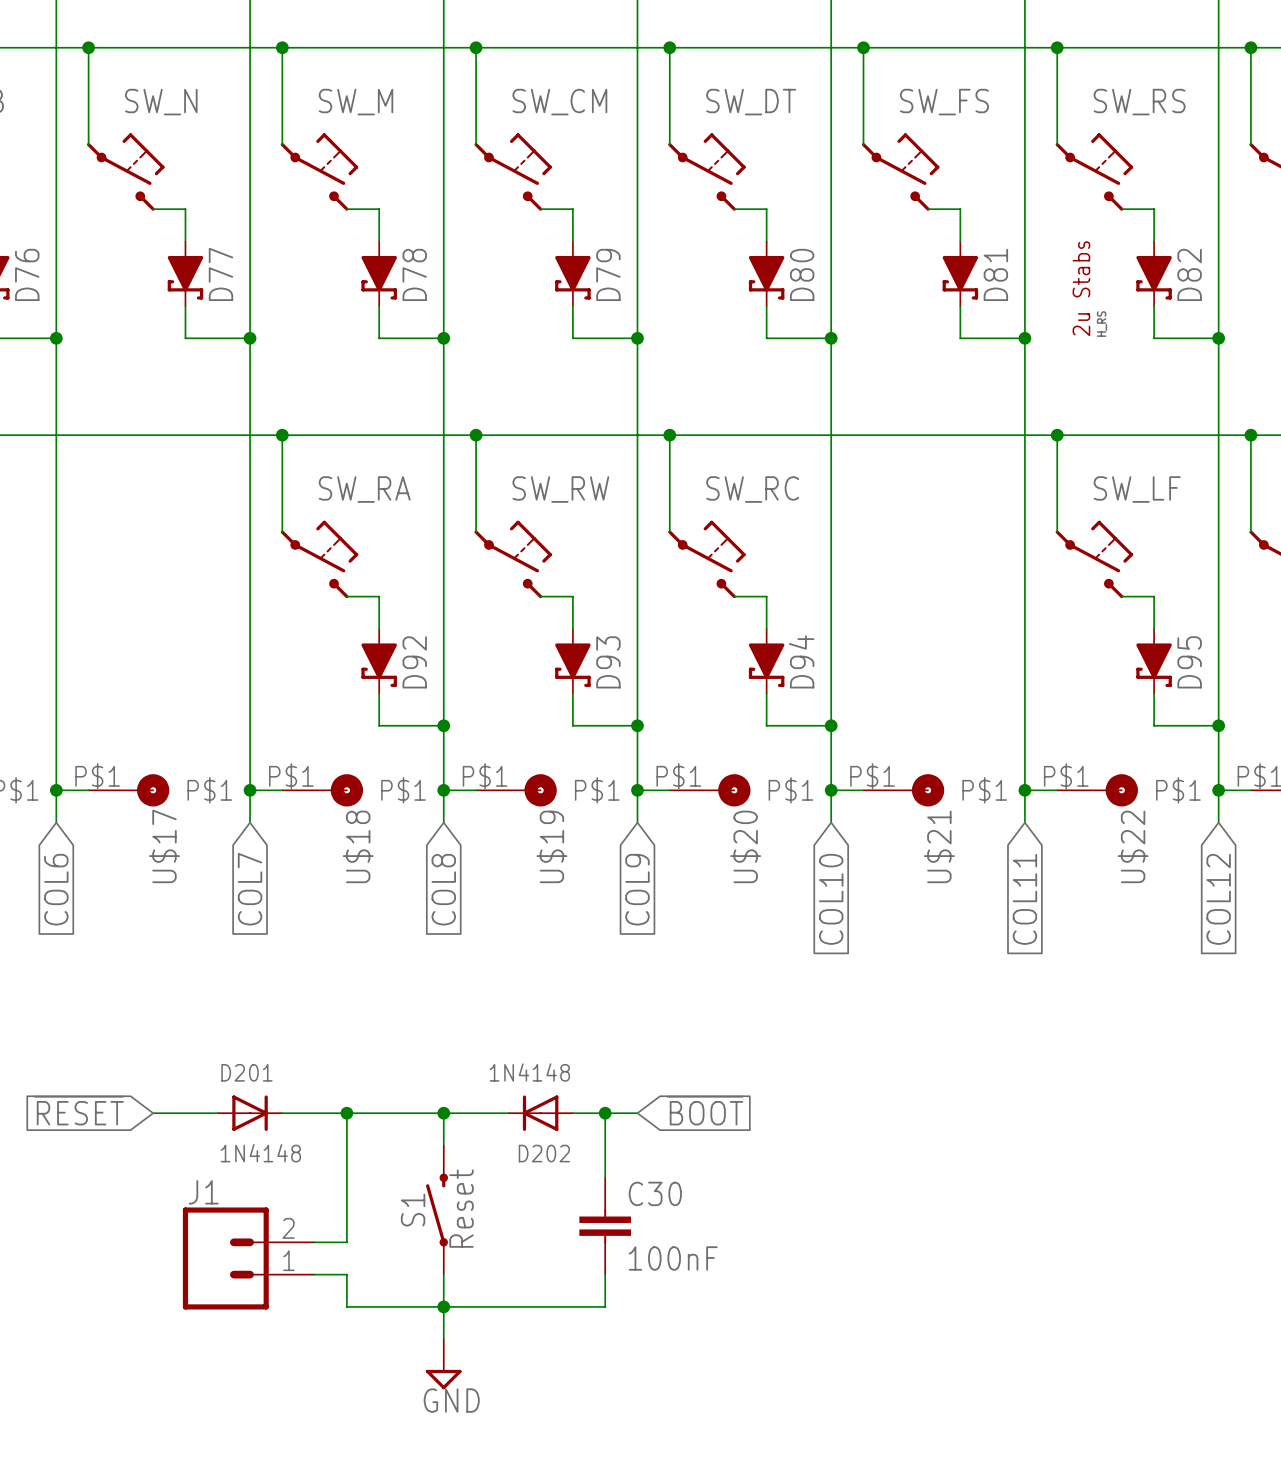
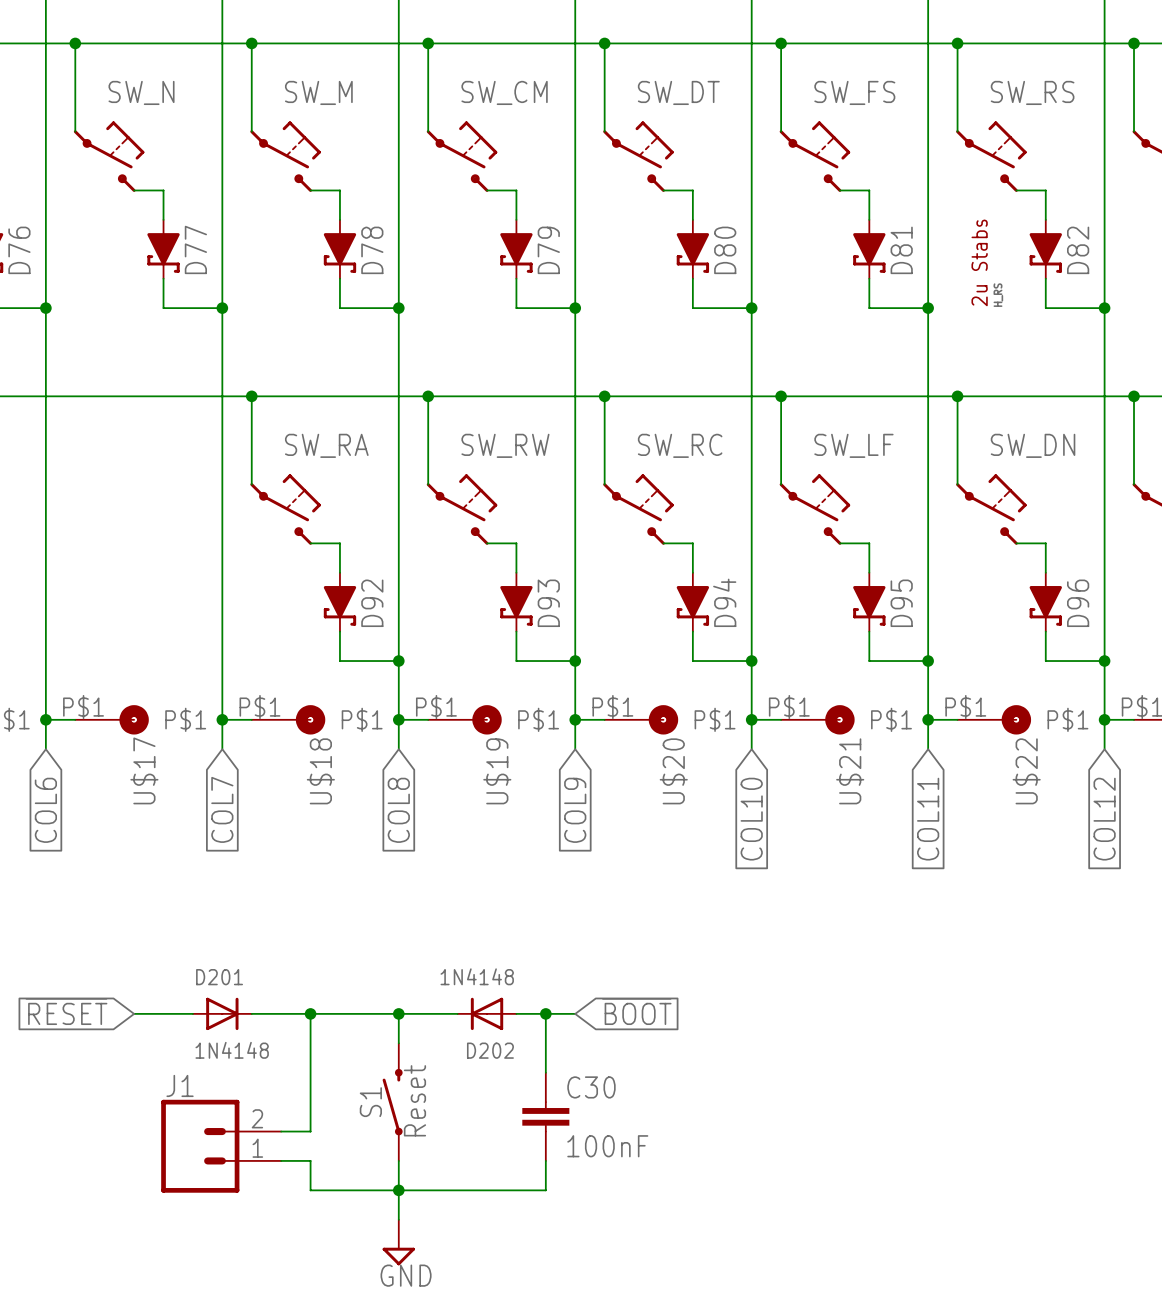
wire: none -> (781, 396) (781, 484)
junction: none -> (781, 396)
SW_LF name: SW_LF (1137, 489) -> SW_DN (1033, 445)
SW_LF: none -> (814, 509)
wire: none -> (839, 543) (869, 543) (869, 572)
D95: none -> (869, 602)
D95 name: D95 (1189, 662) -> D96 (1078, 603)
wire: none -> (869, 631) (869, 661) (928, 661)
junction: none -> (928, 661)

